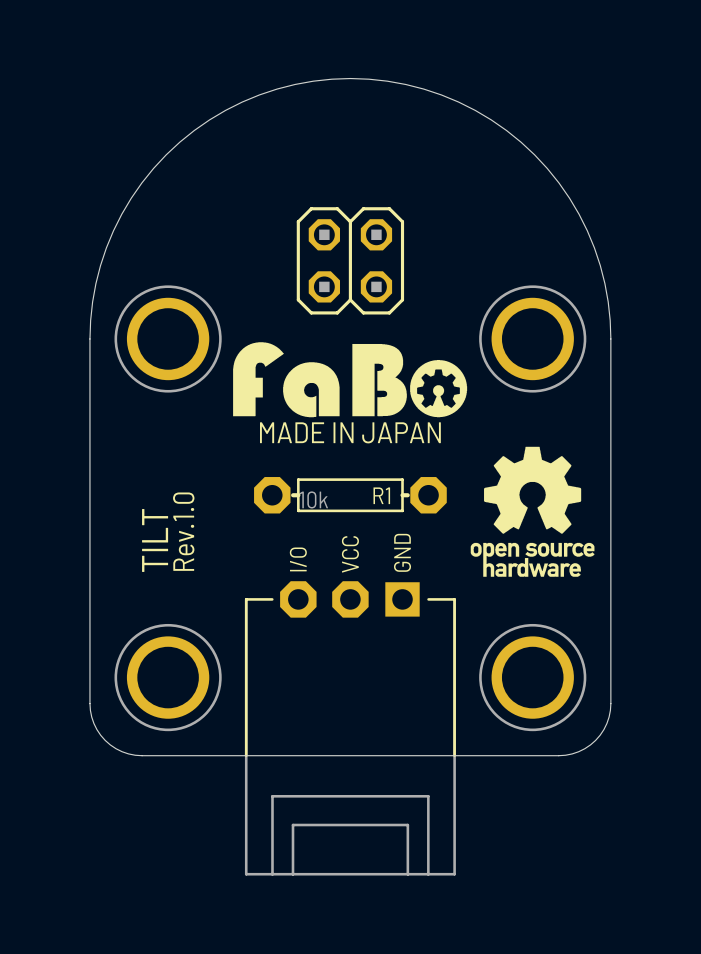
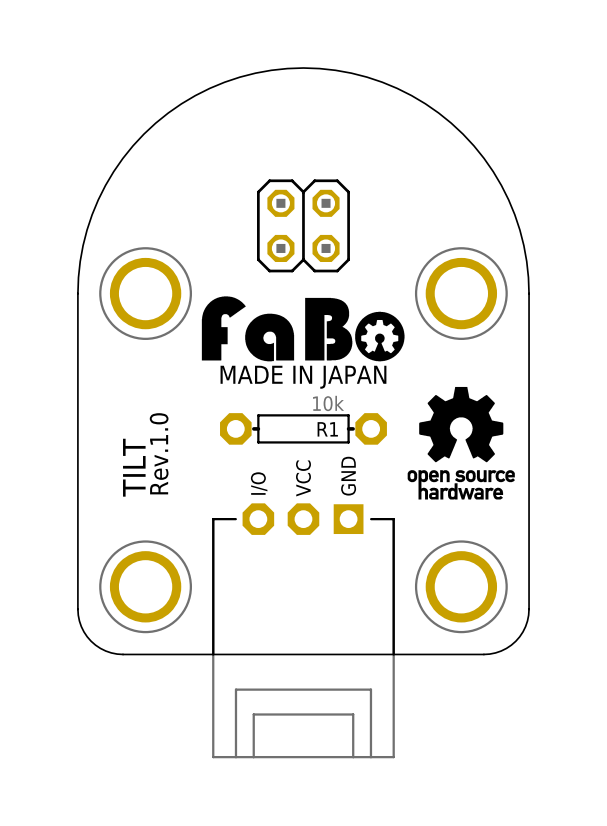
R1 value position: 10k (313, 499) -> 10k (328, 403)

